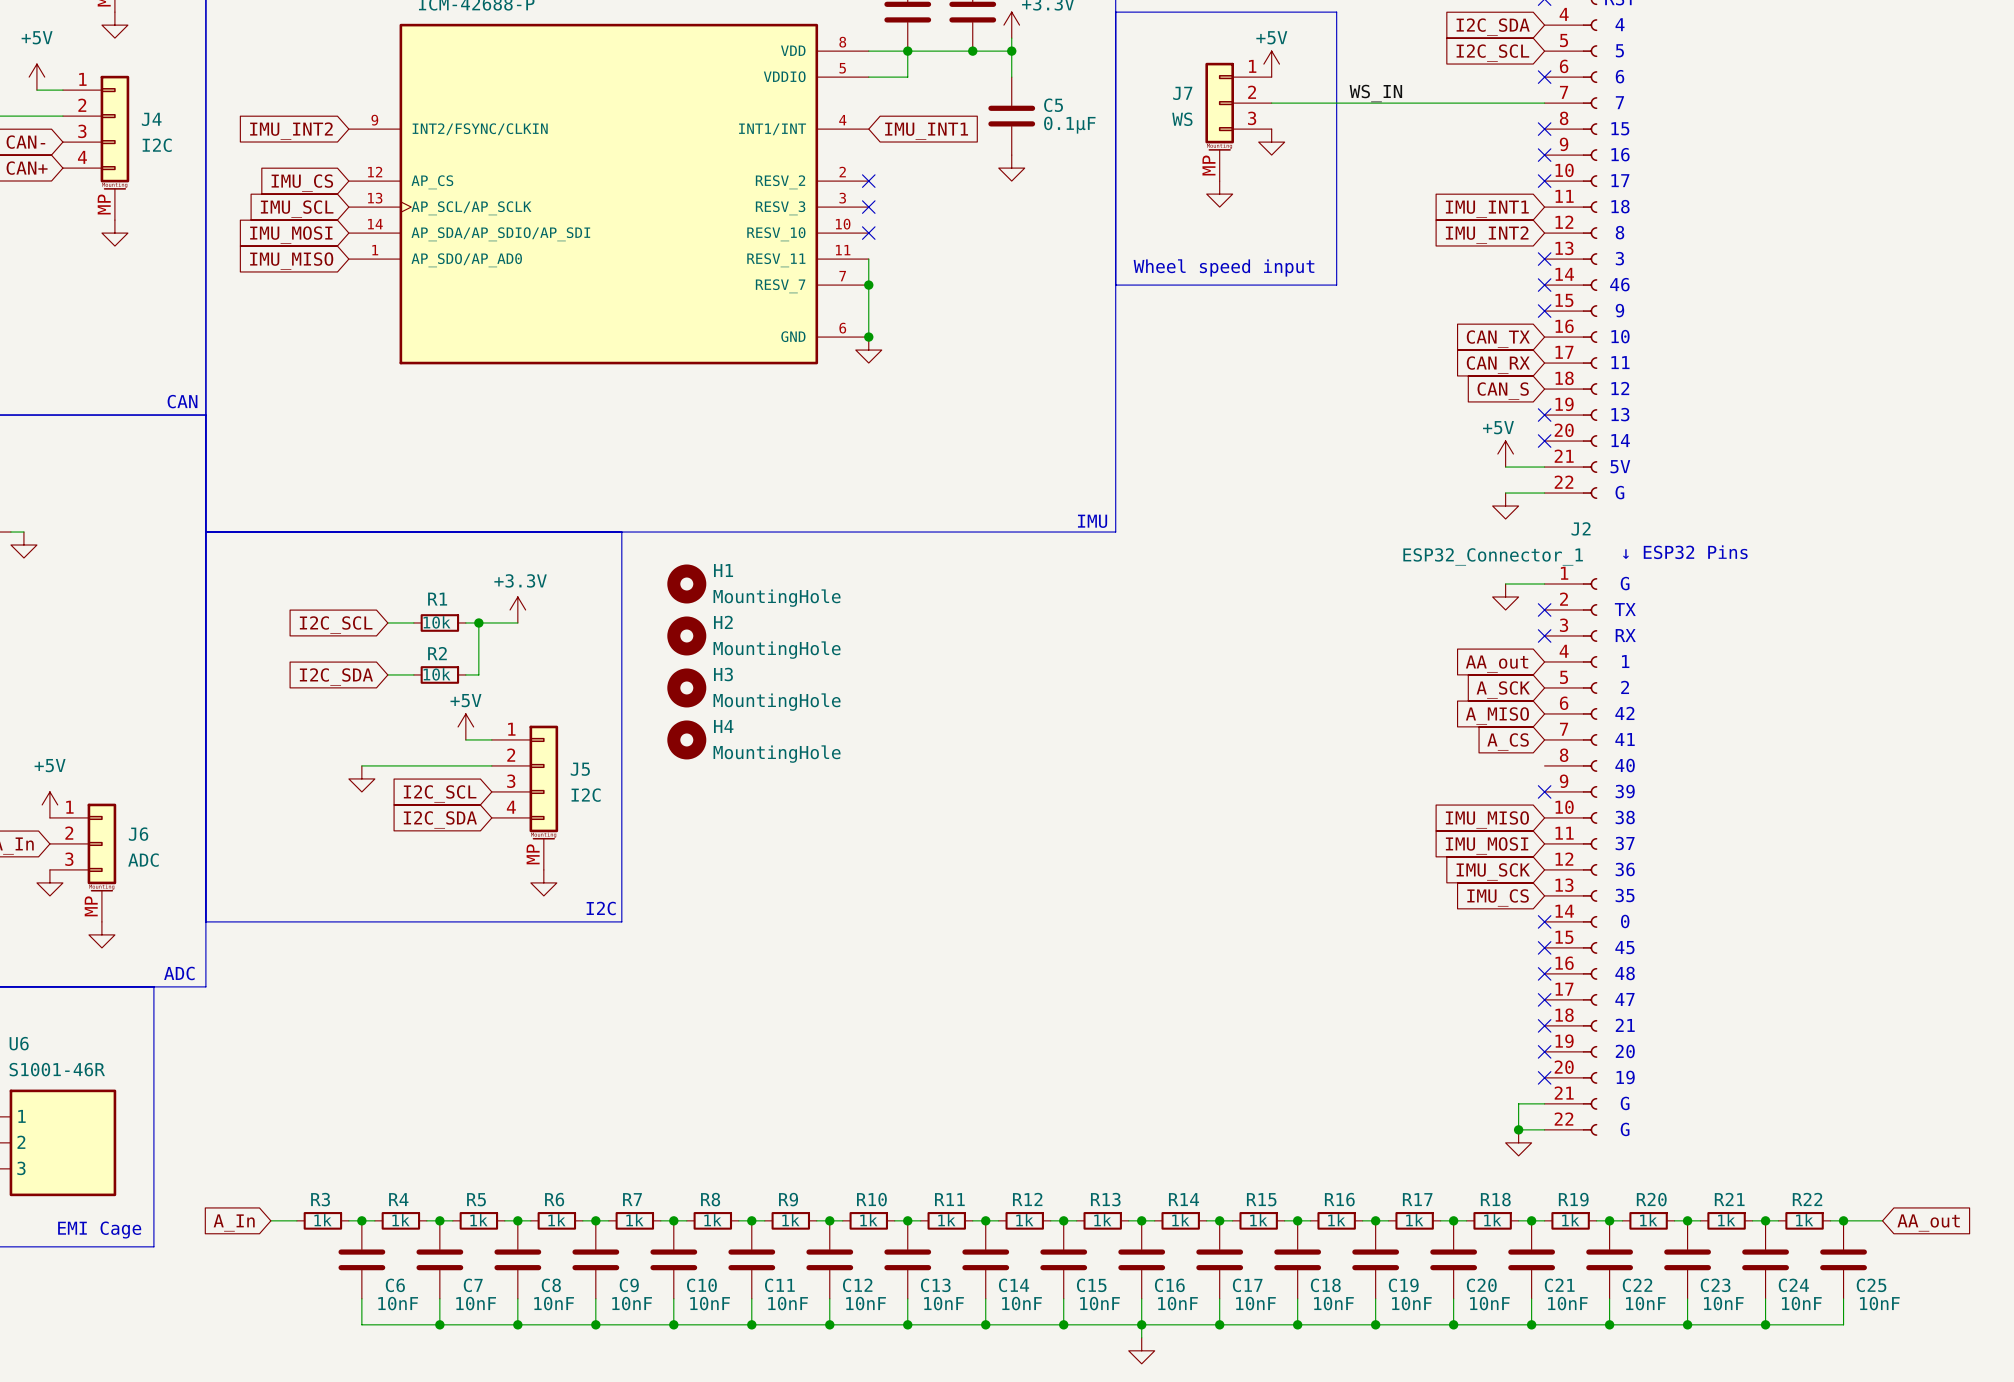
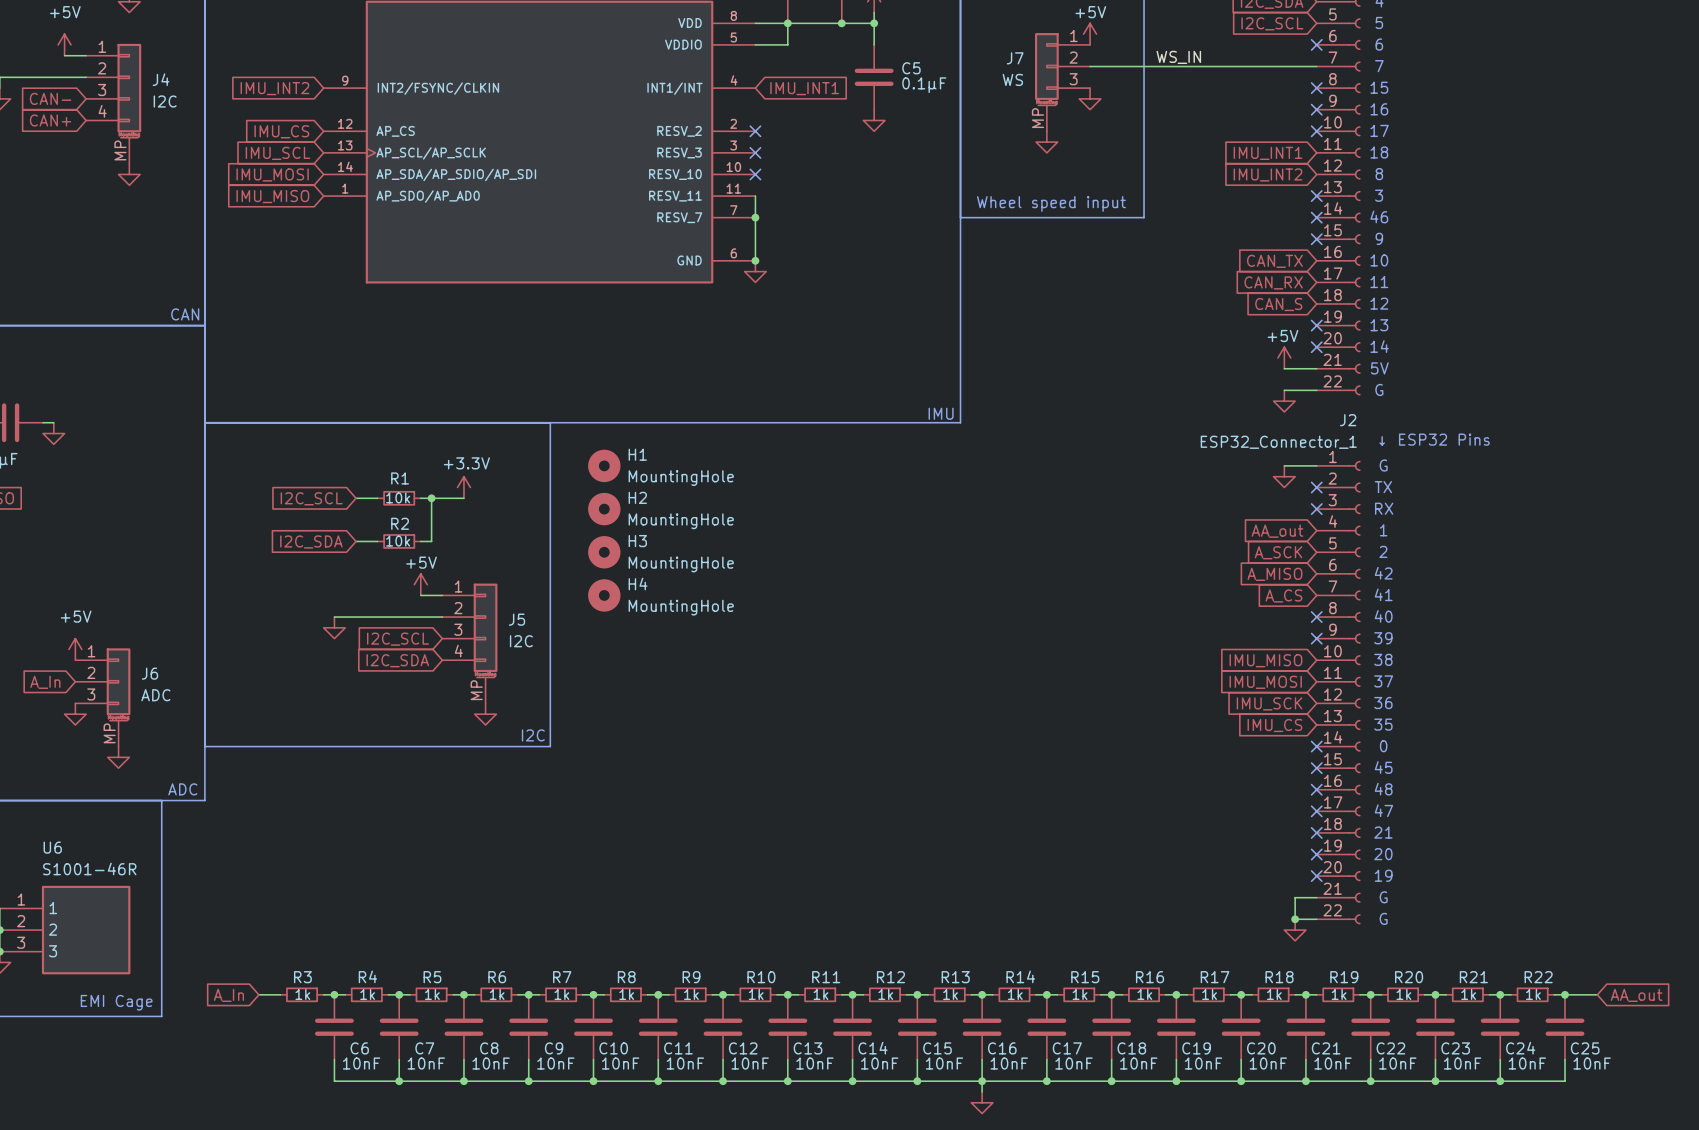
no-connect mark: none -> (1316, 617)

